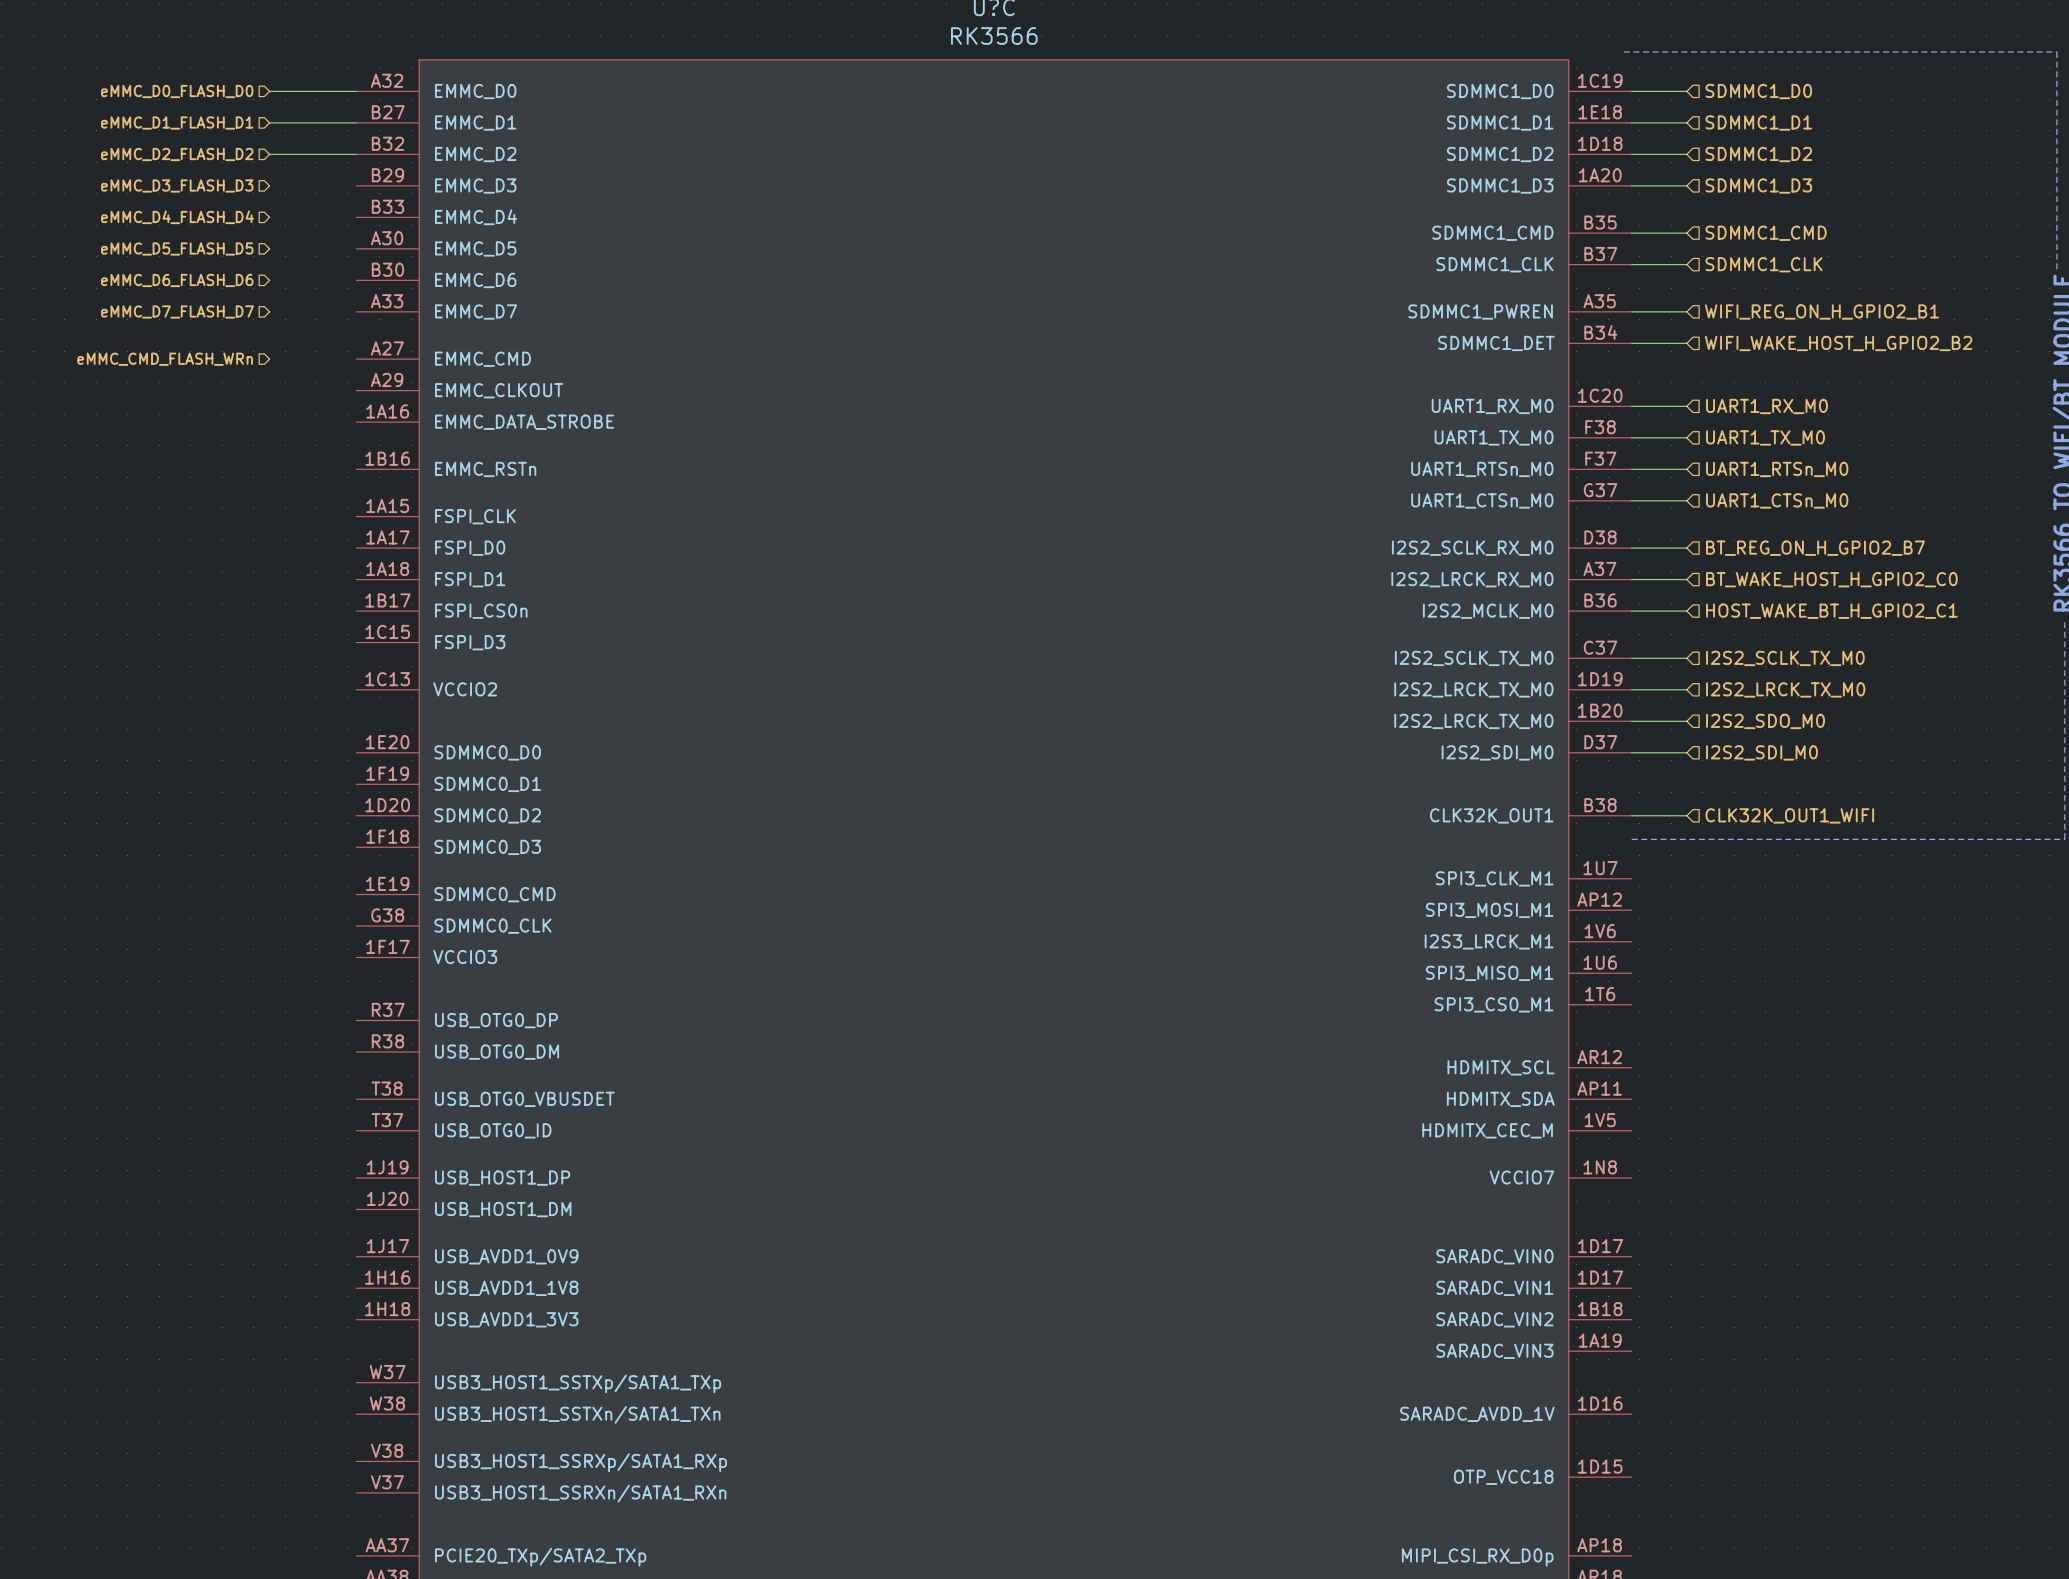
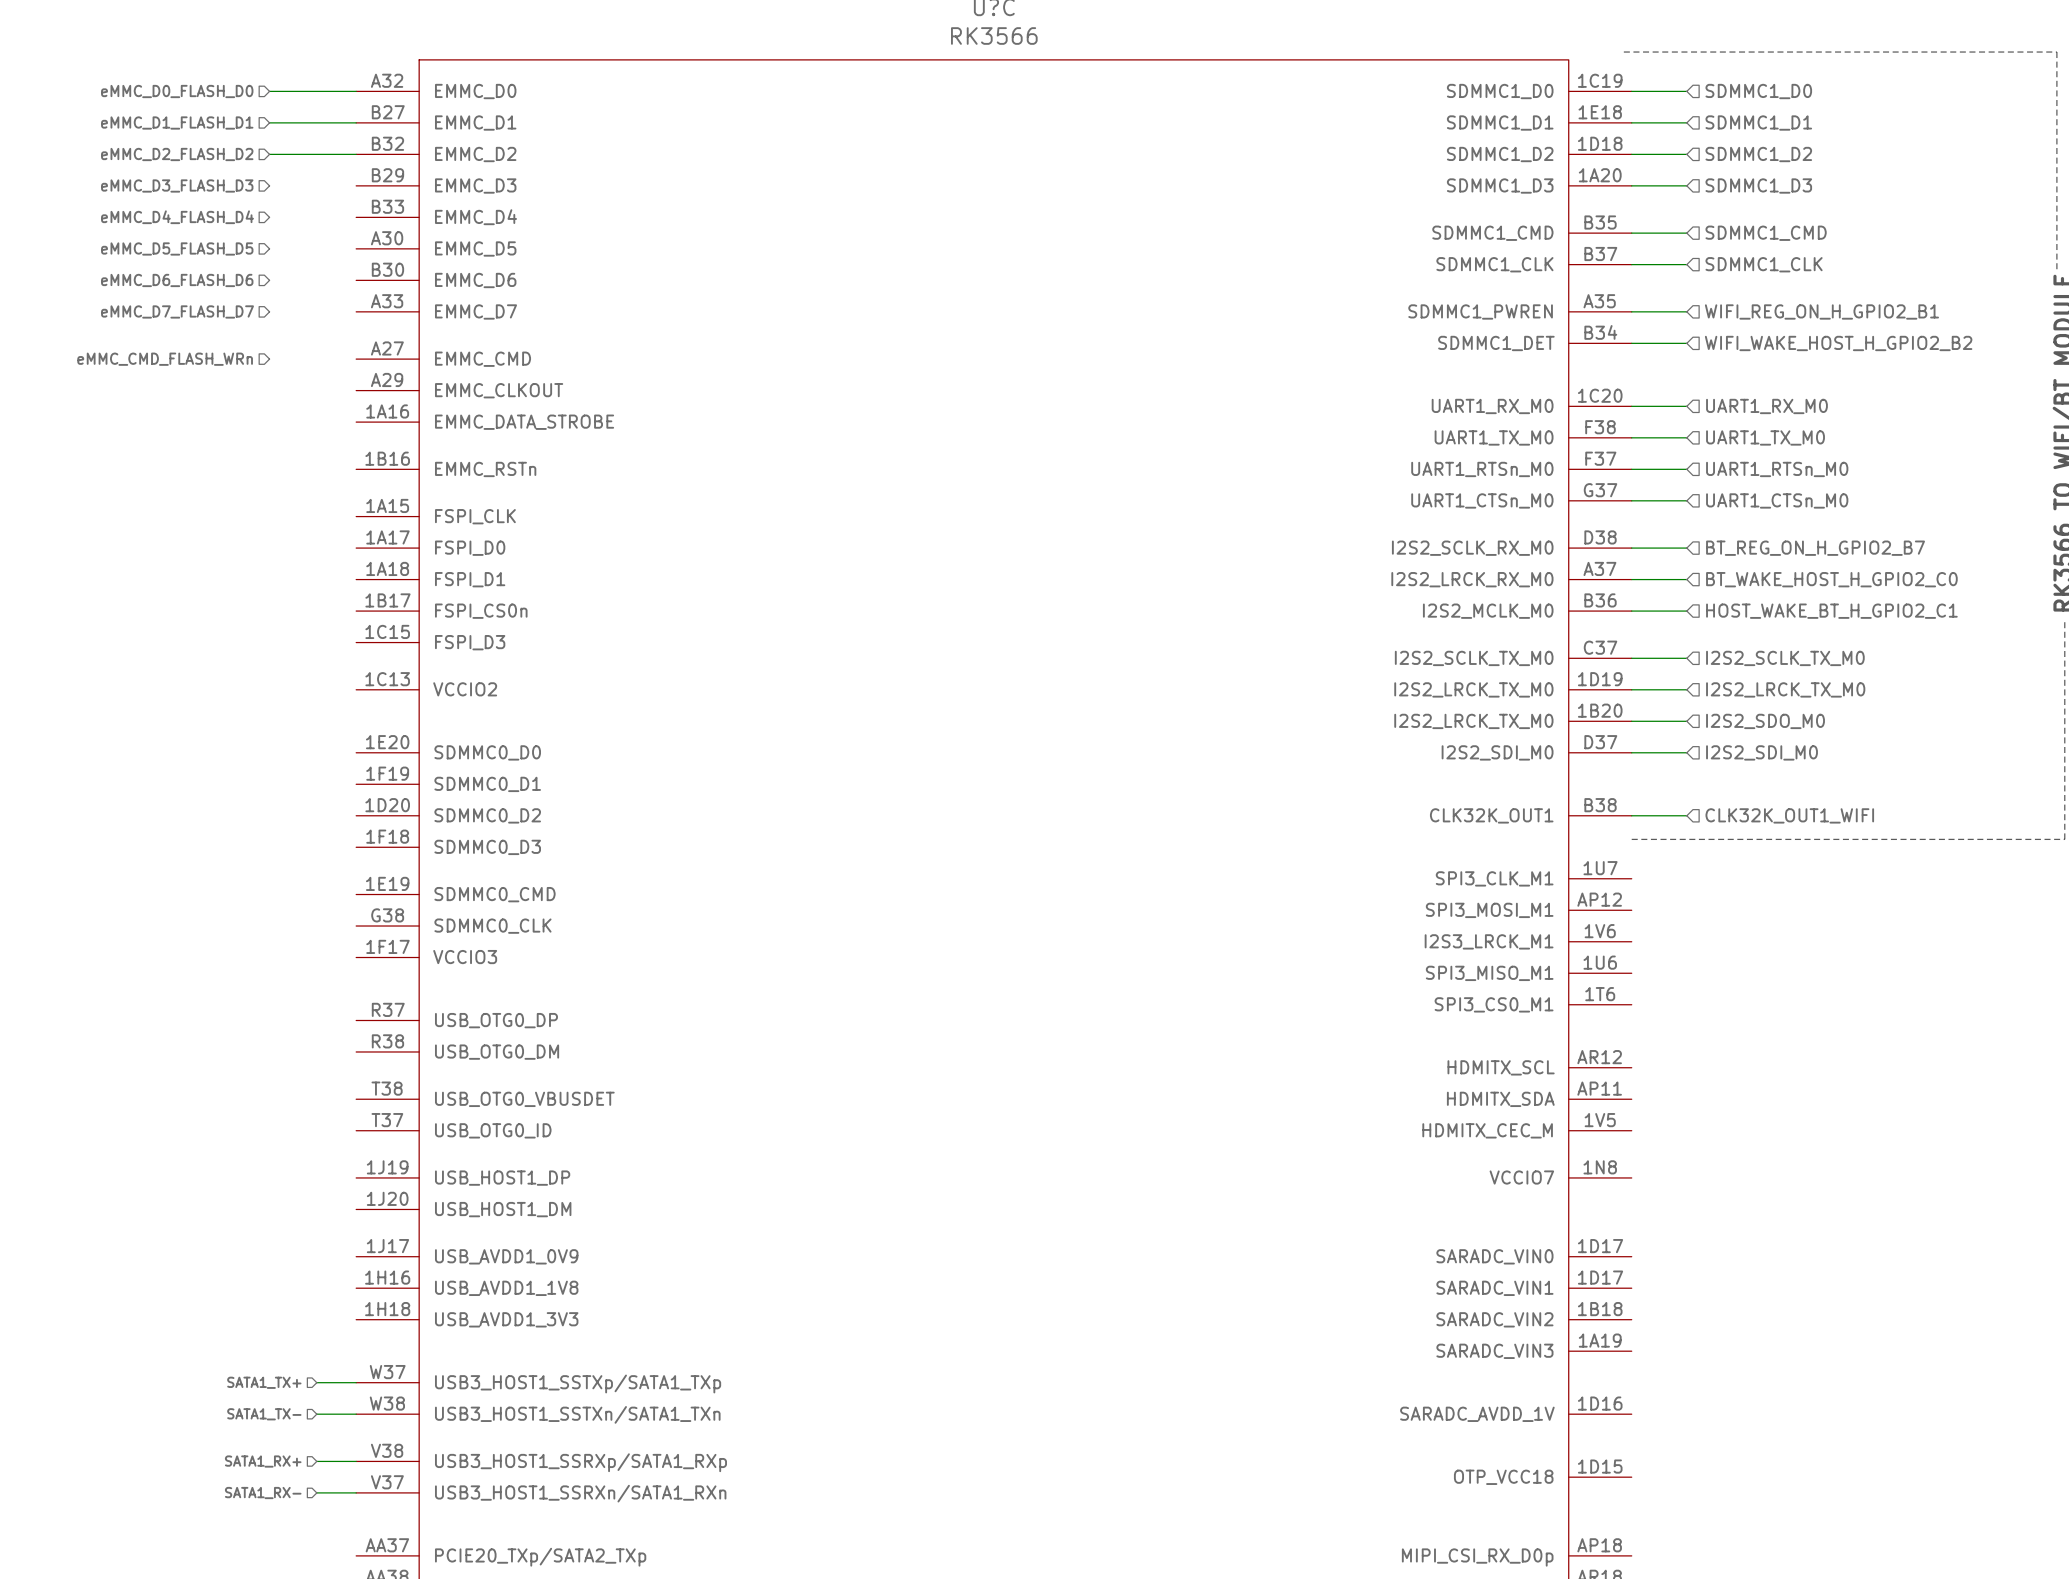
hierarchical label: none -> SATA1_TX+ (264, 1382)
wire: none -> (316, 1382) (356, 1382)
hierarchical label: none -> SATA1_TX- (264, 1414)
wire: none -> (316, 1414) (356, 1414)
hierarchical label: none -> SATA1_RX+ (263, 1461)
wire: none -> (316, 1461) (356, 1461)
wire: none -> (316, 1492) (356, 1492)
hierarchical label: none -> SATA1_RX- (263, 1493)

